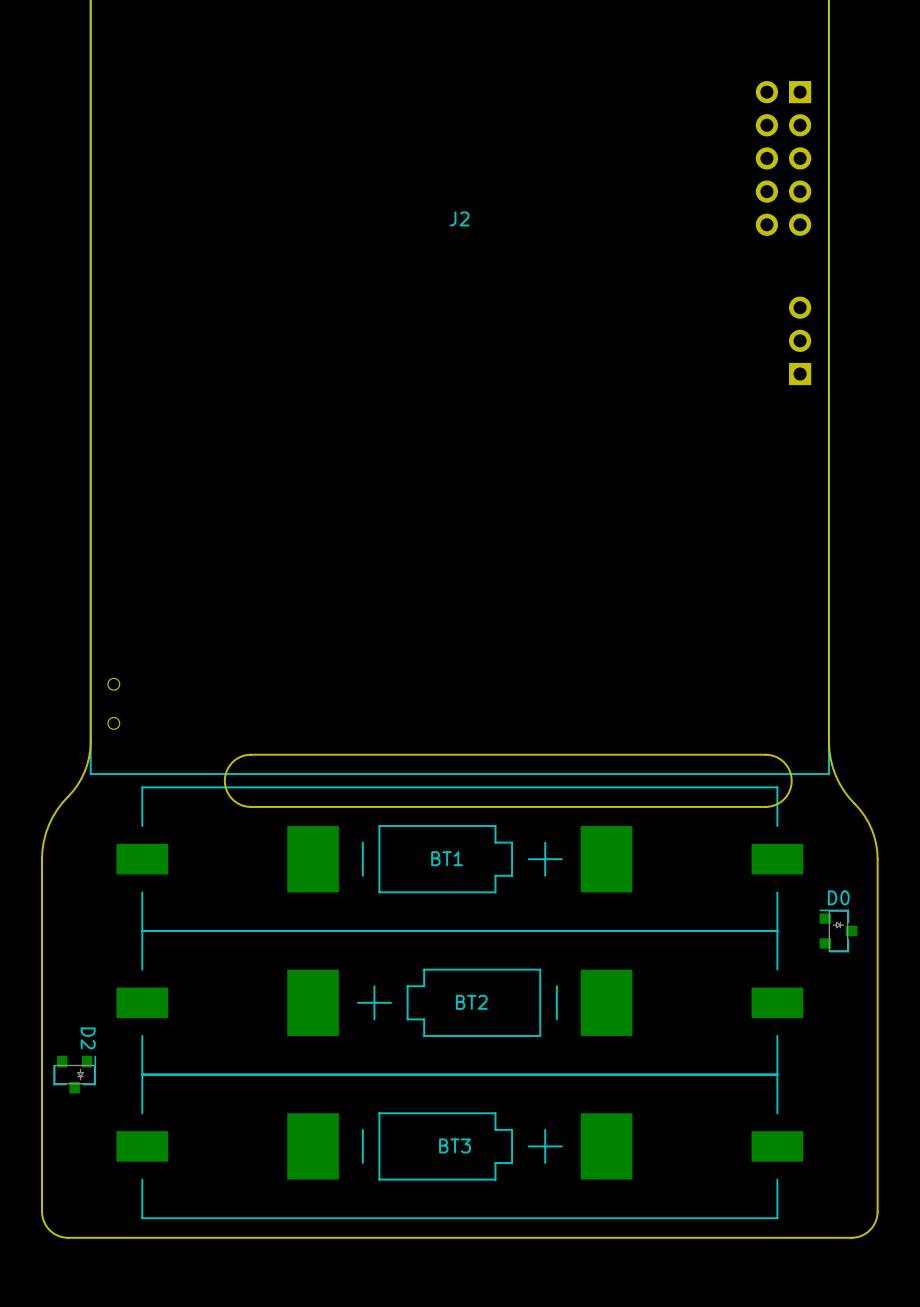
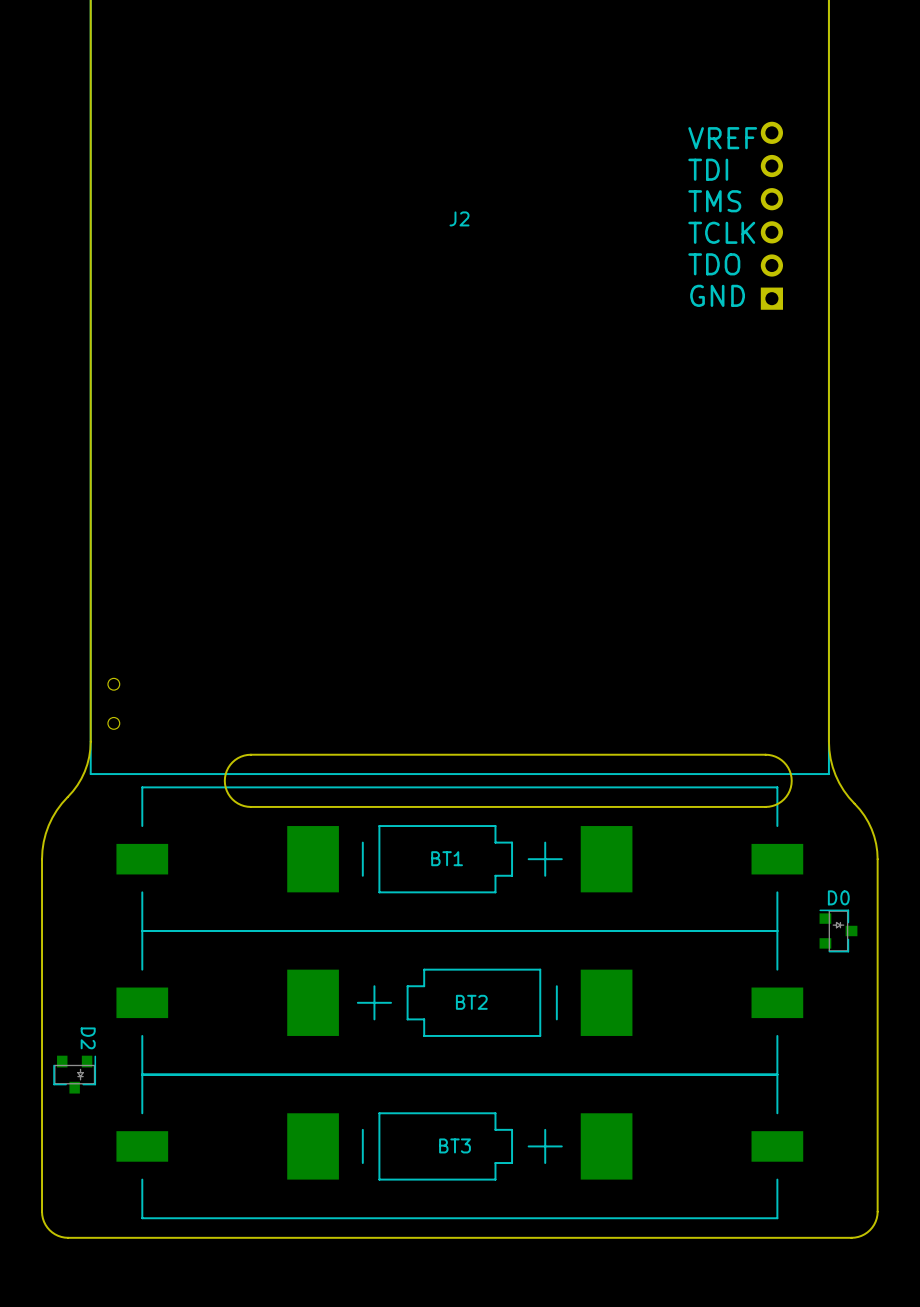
text: none -> VREF (722, 138)
part: (783, 158) -> none
text: none -> TDI (708, 169)
text: none -> TMS (714, 201)
part: none -> (771, 215)
text: none -> TCLK (721, 232)
text: none -> TDO (714, 264)
text: none -> GND (717, 295)
part: (800, 340) -> none

